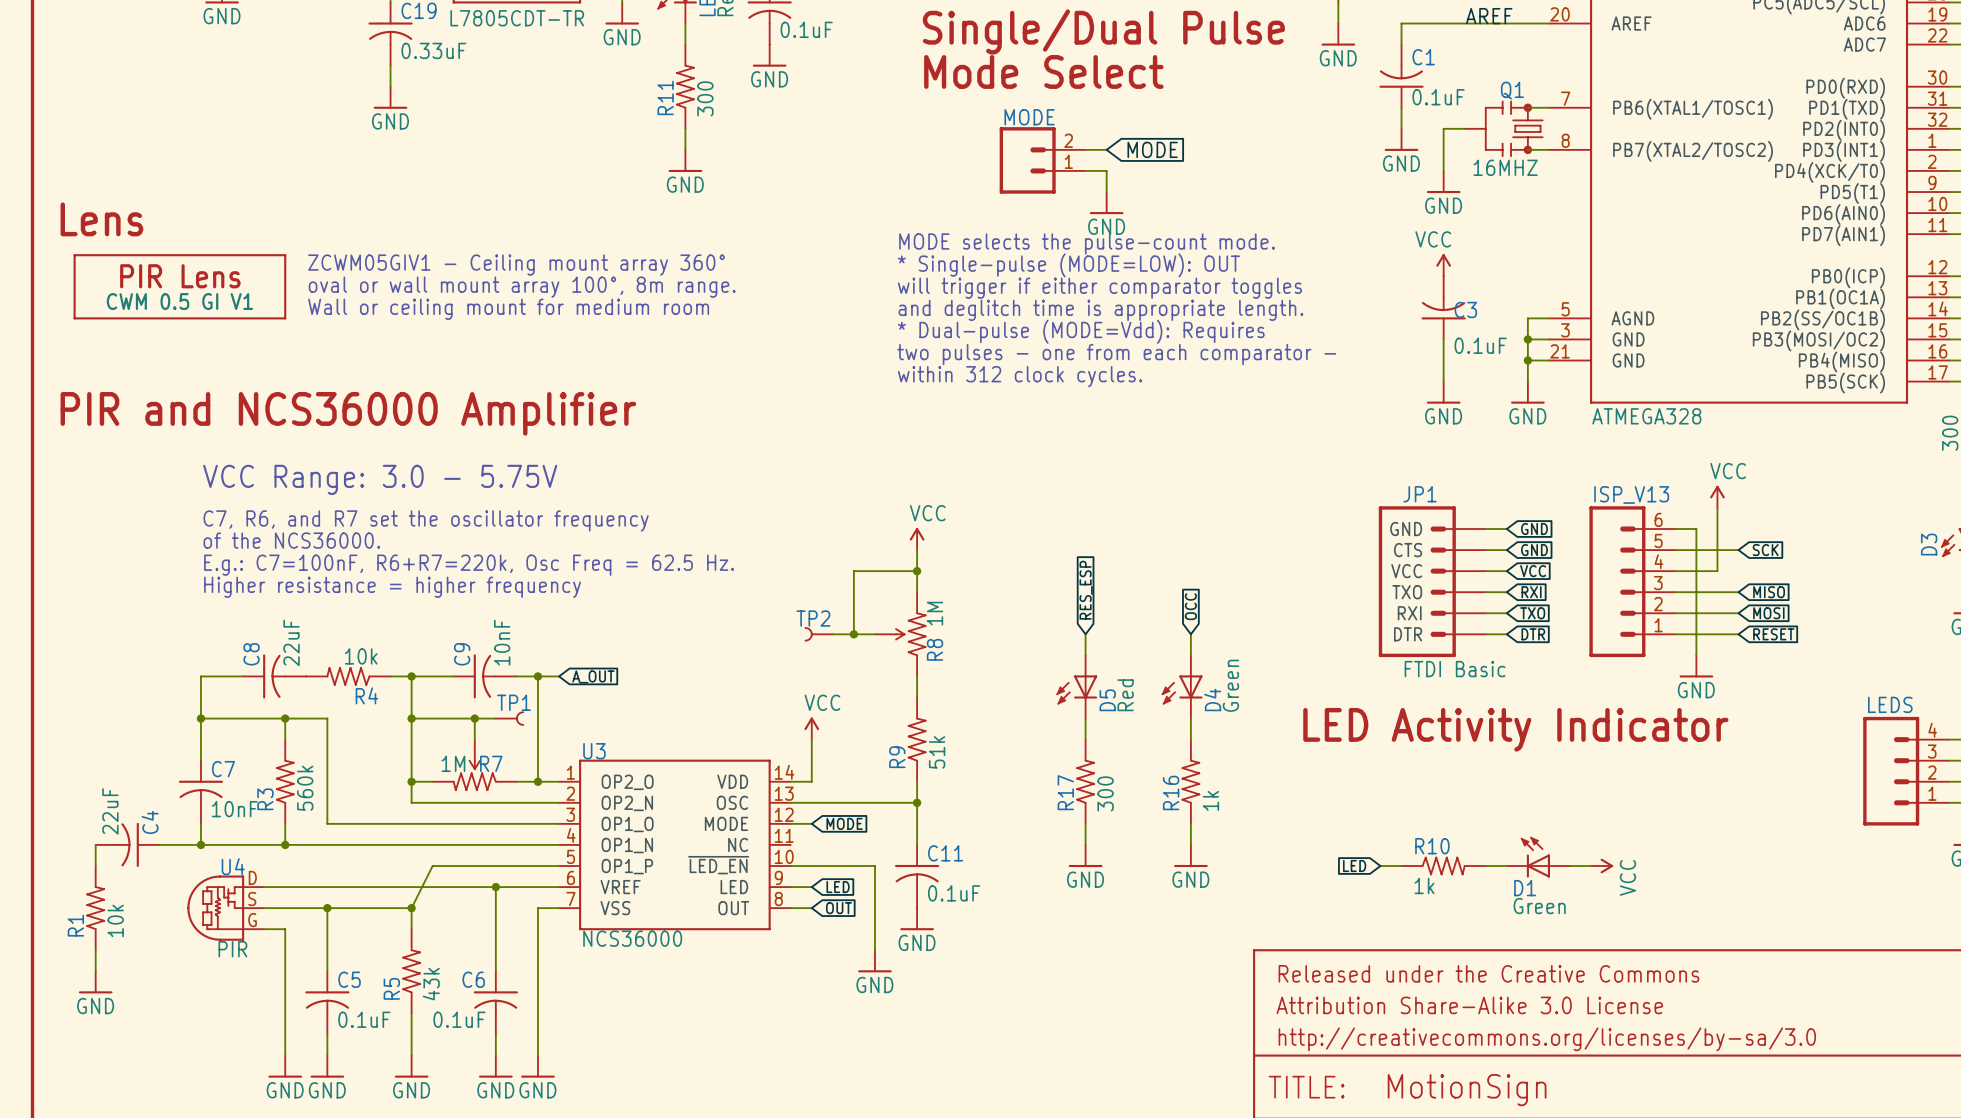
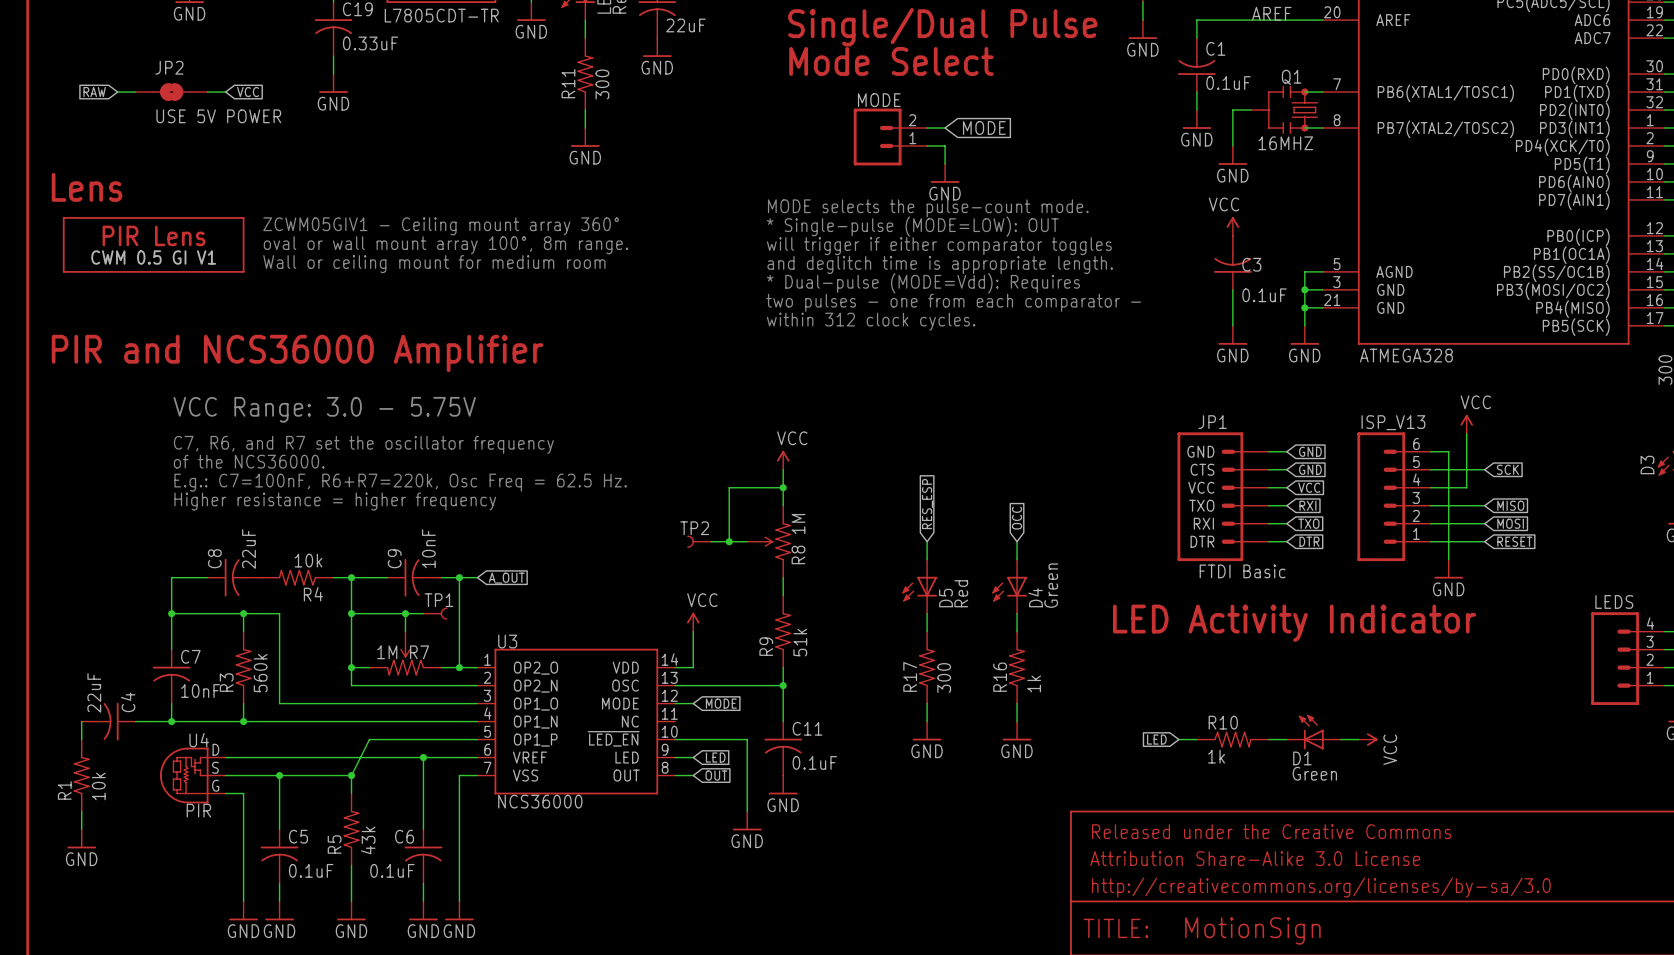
part value: 0.1uF (806, 29) -> 22uF (685, 25)
global label: none -> RAW (94, 92)
wire: none -> (117, 92) (135, 92)
JP2: none -> USE 5V POWER (171, 92)
wire: none -> (207, 92) (225, 92)
global label: none -> VCC (248, 92)

